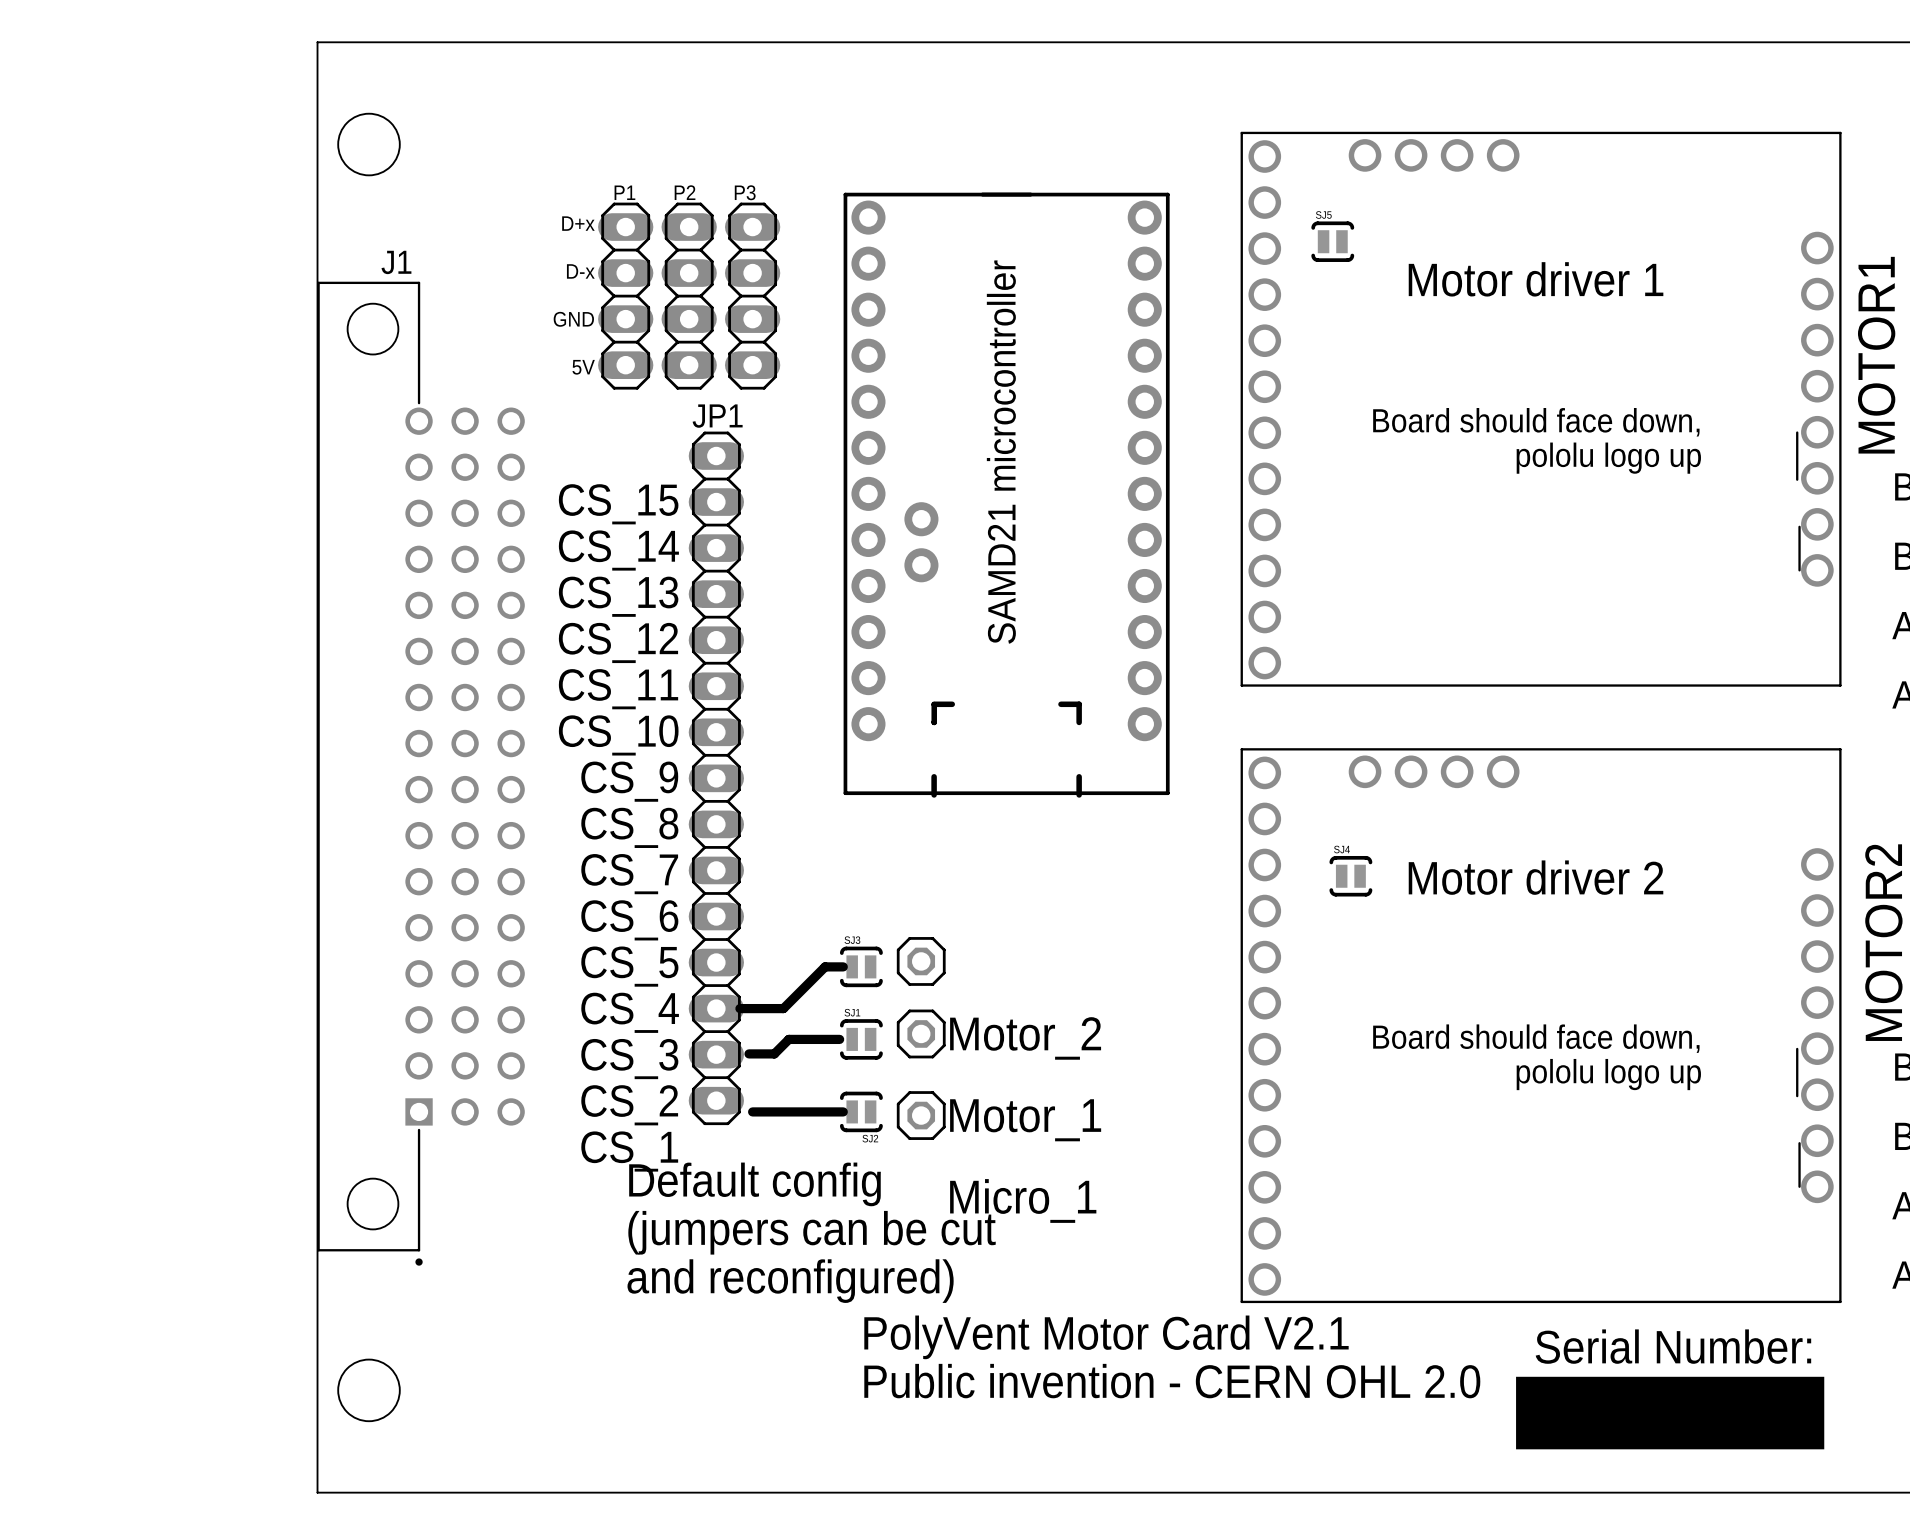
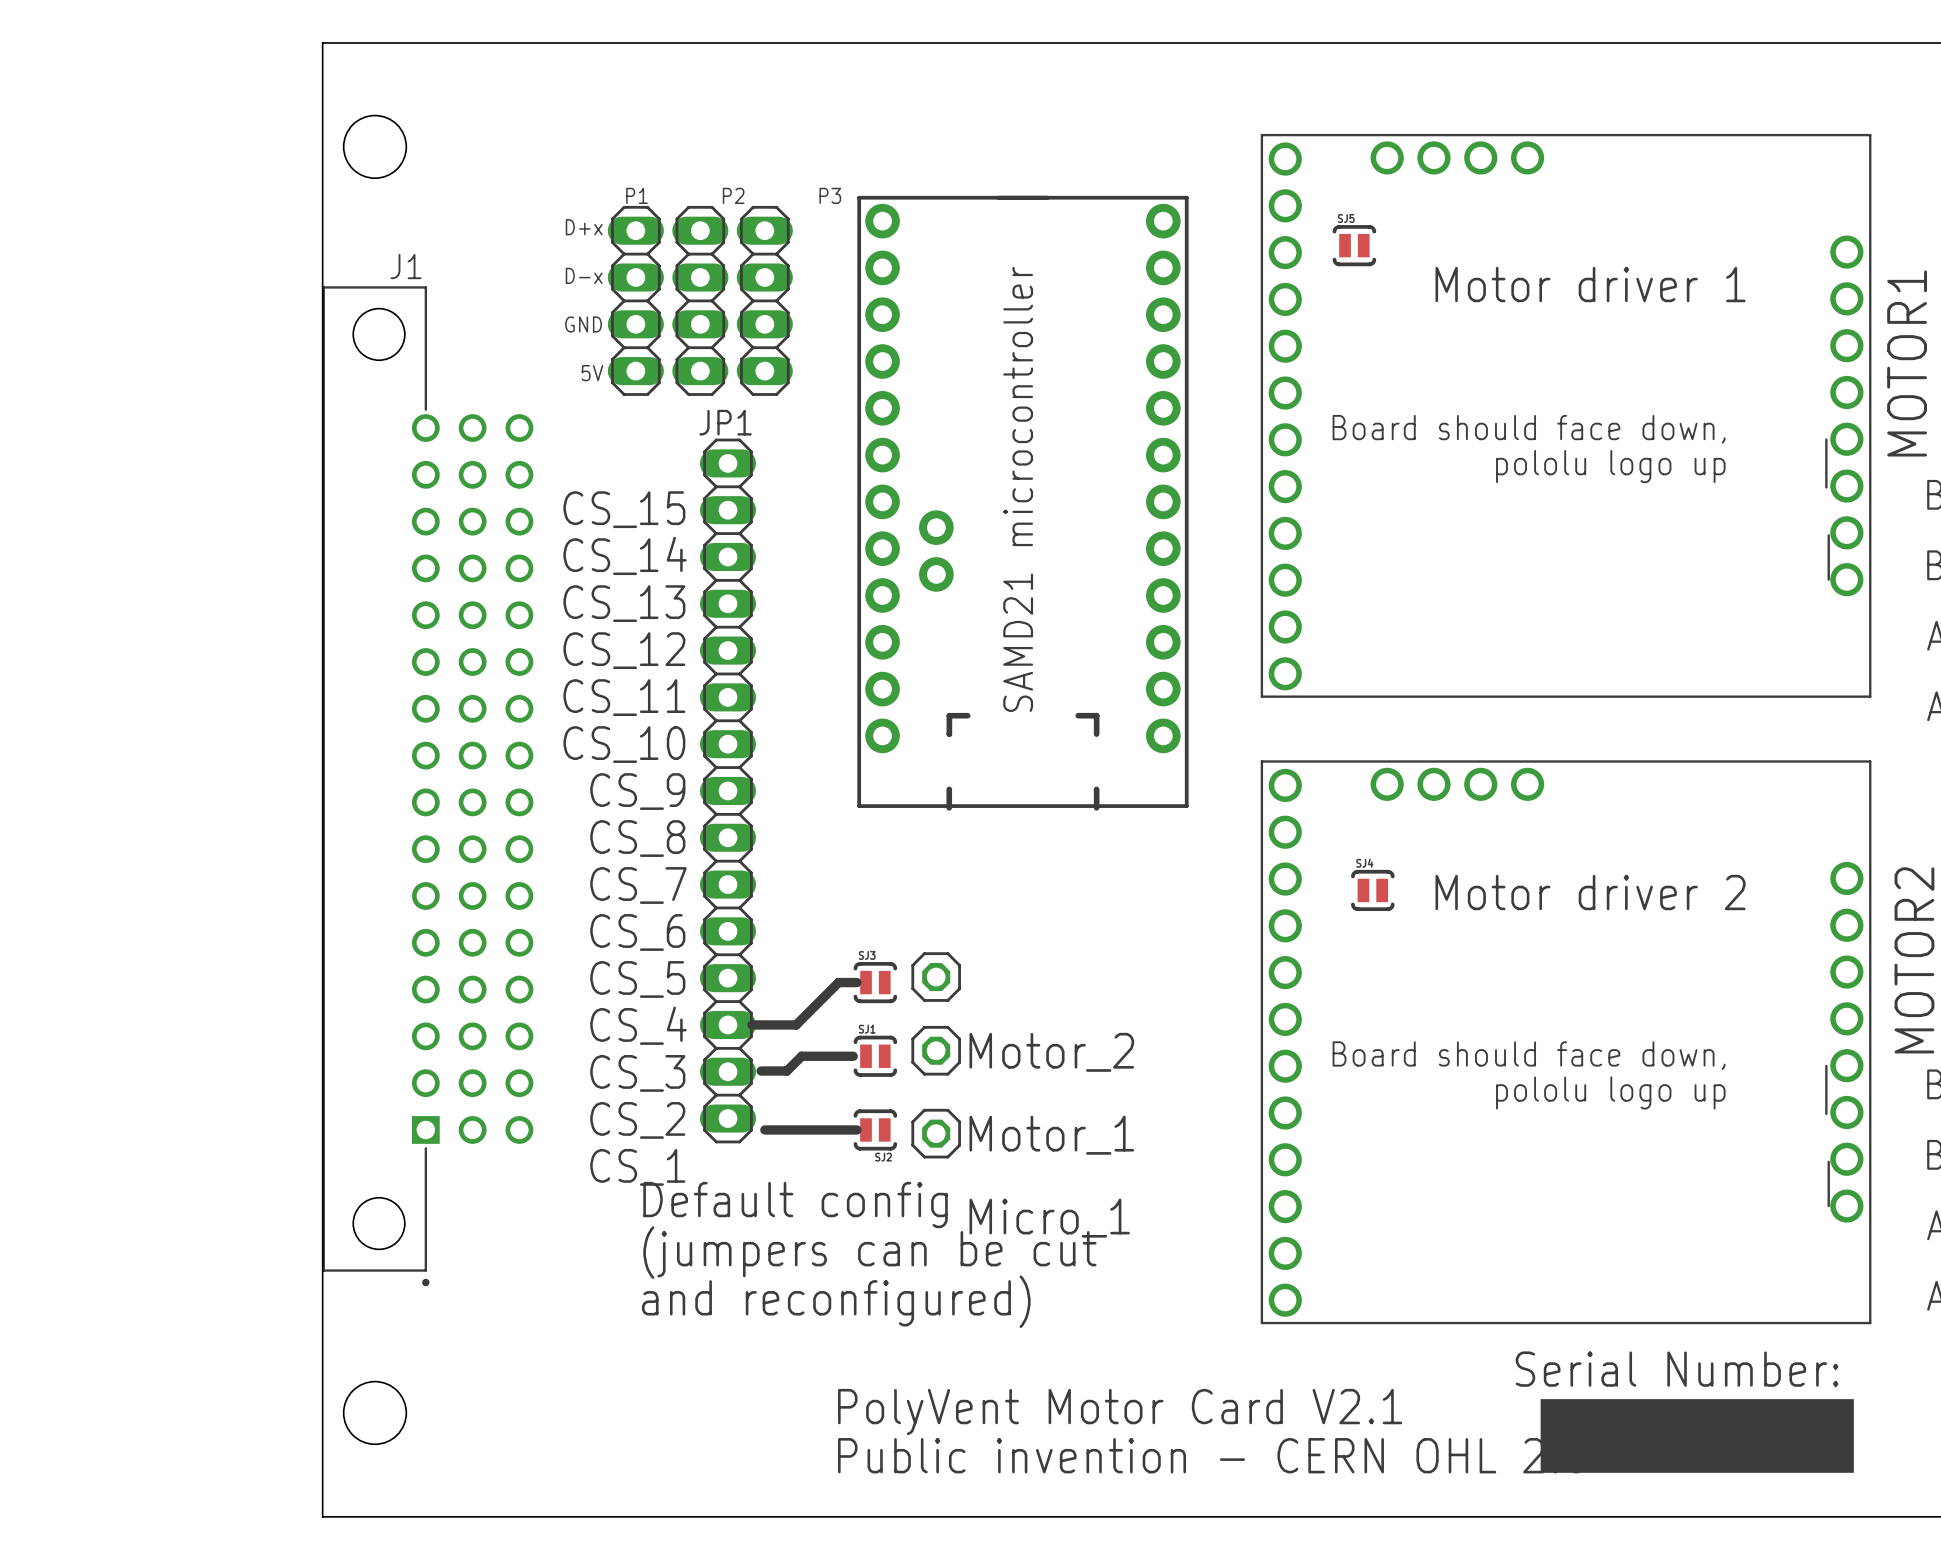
text position: PolyVent Motor Card V2.1 (1106, 1337) -> PolyVent Motor Card V2.1 (1120, 1412)
text position: Public invention - CERN OHL 2.0 (1172, 1381) -> Public invention - CERN OHL 2.0 (1212, 1455)

